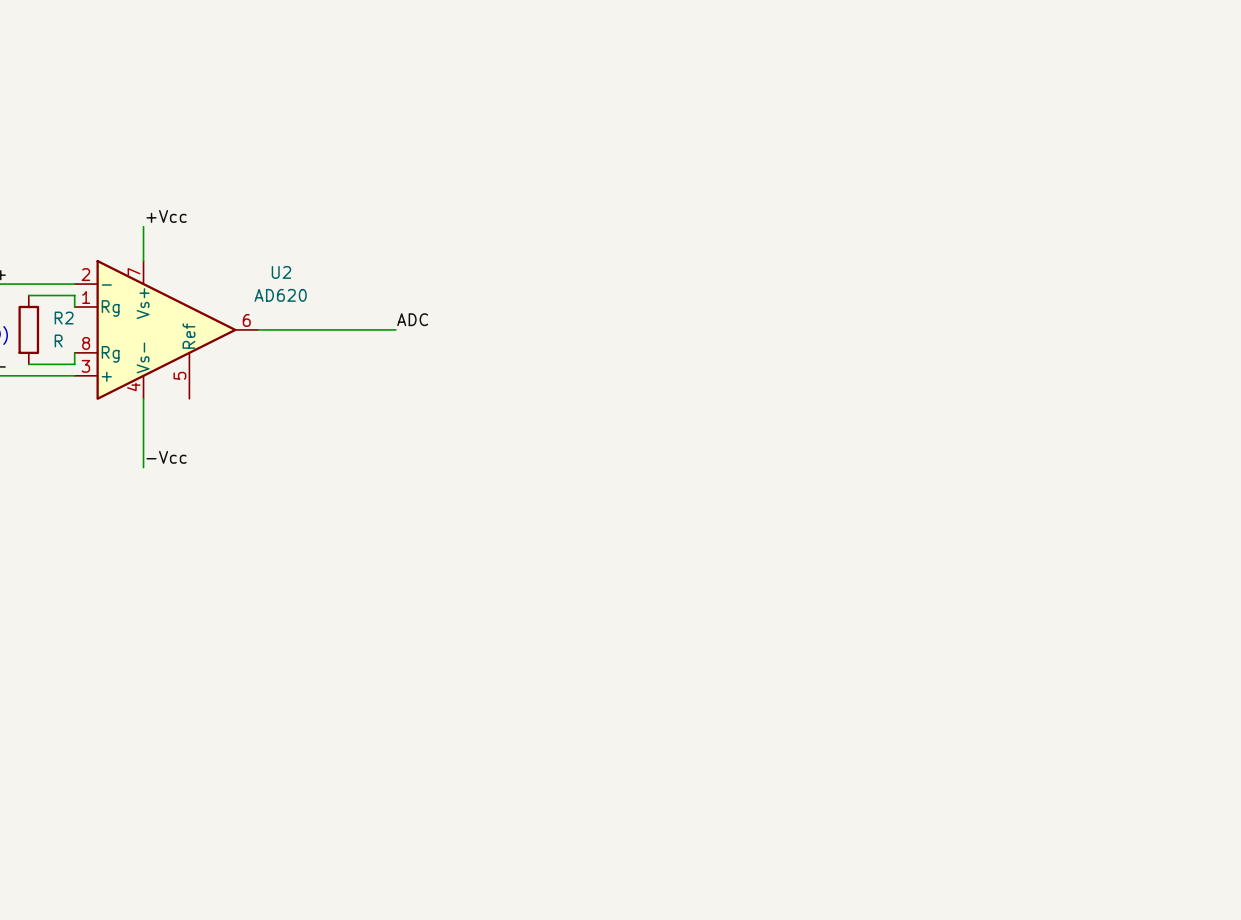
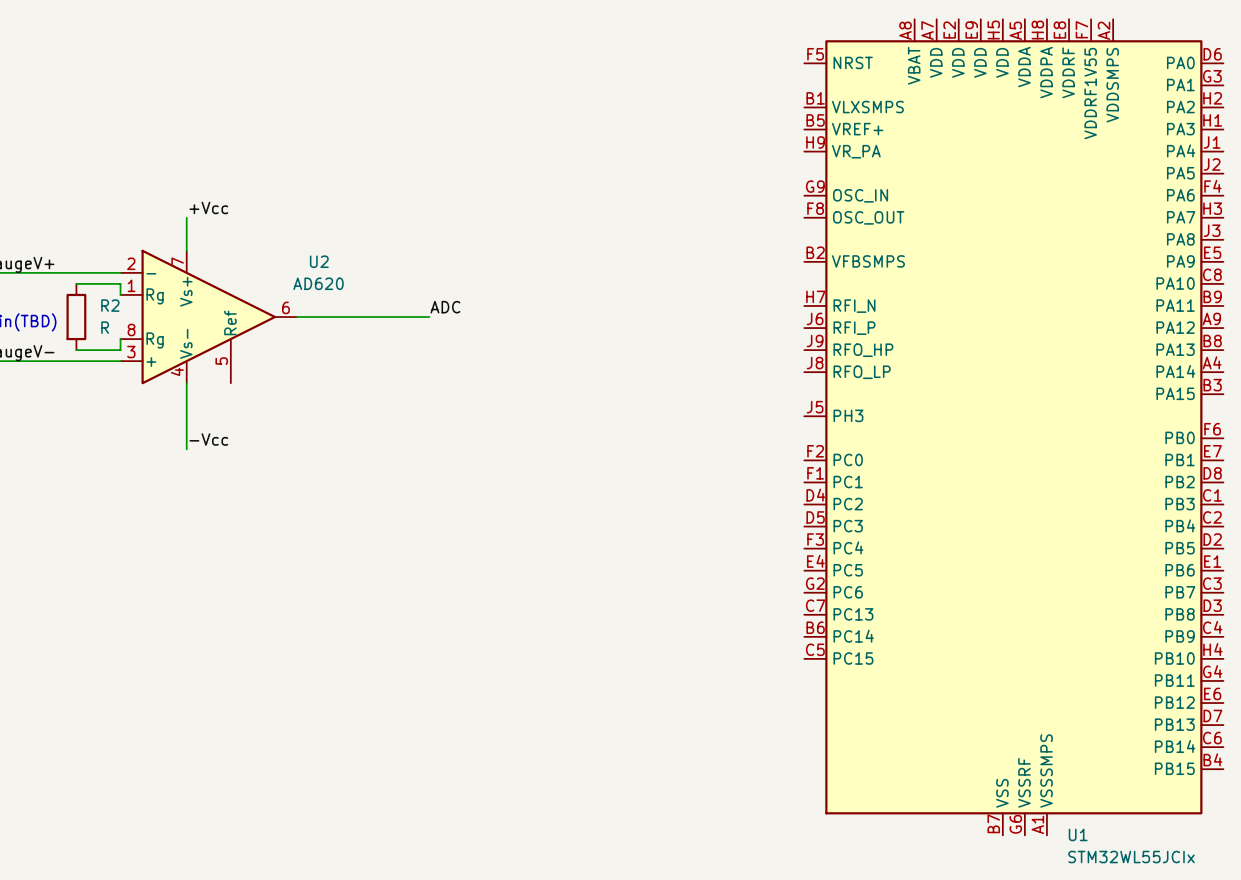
U1: none -> STM32WL55JCIx (1013, 427)

